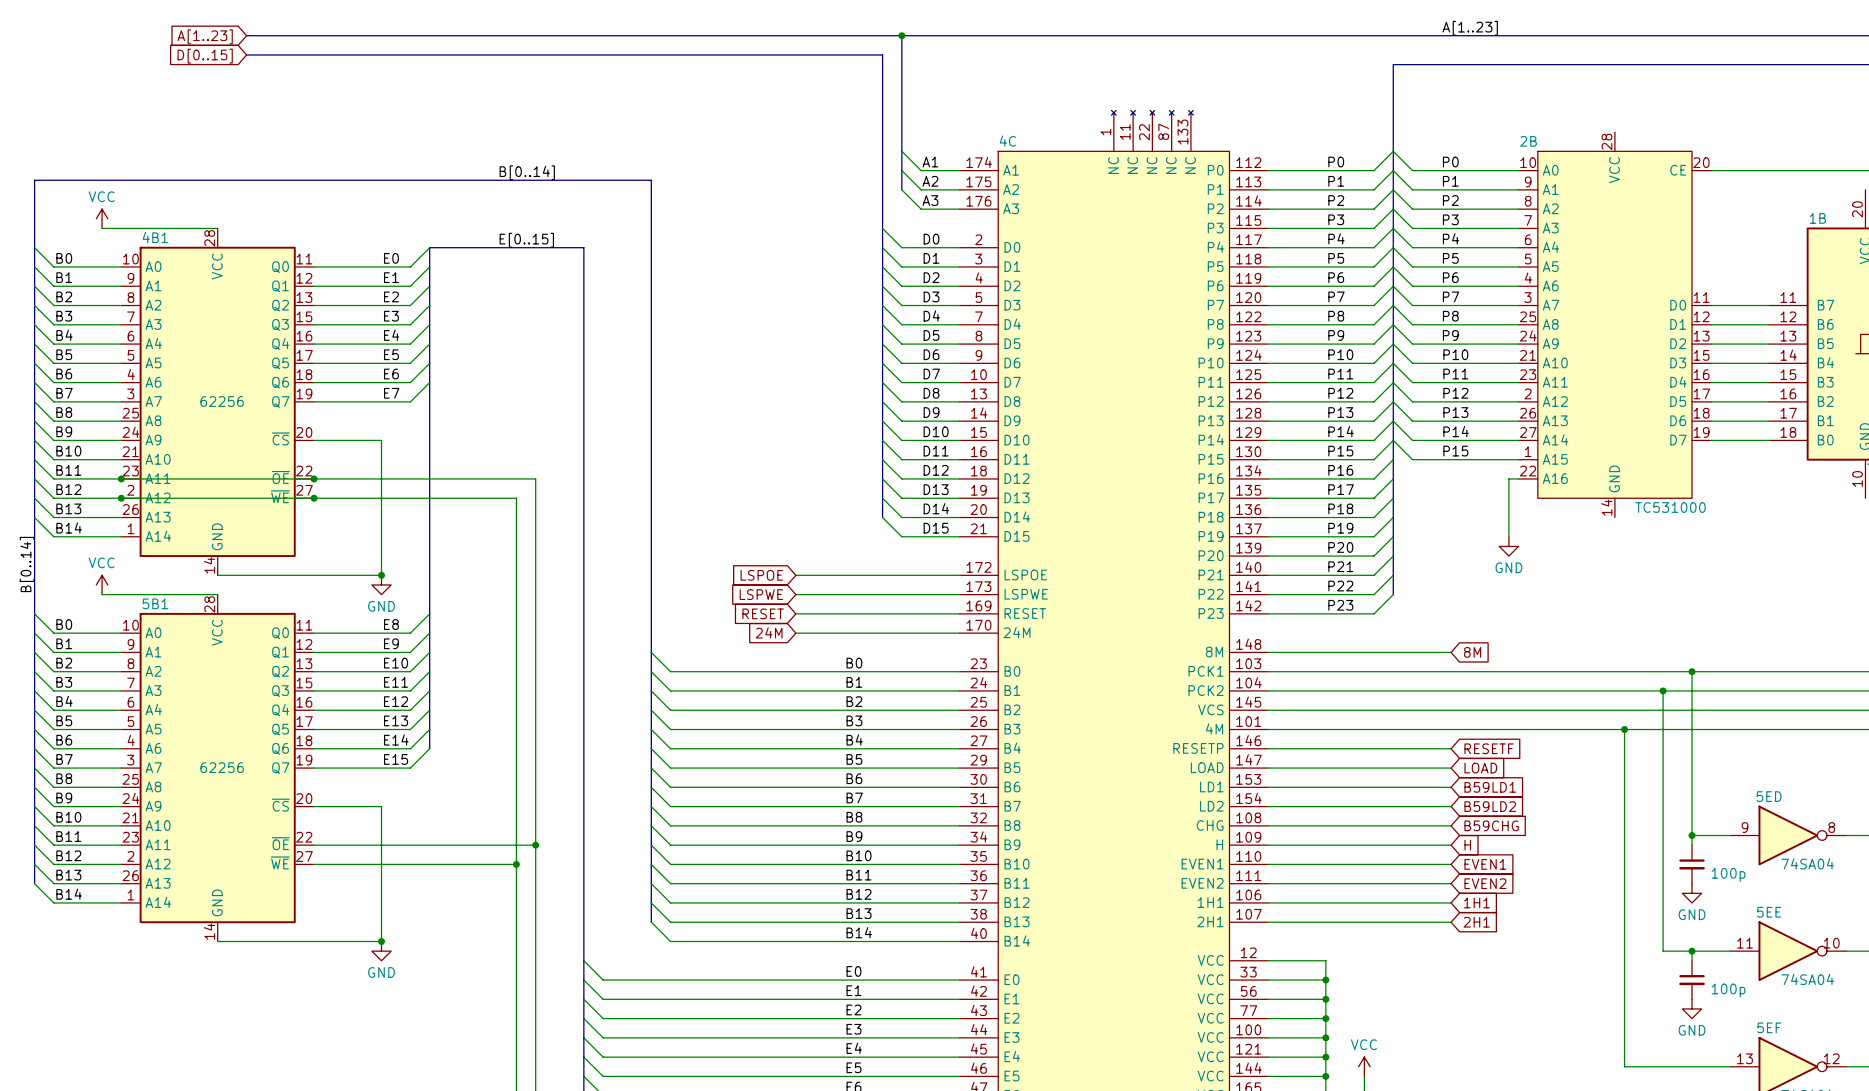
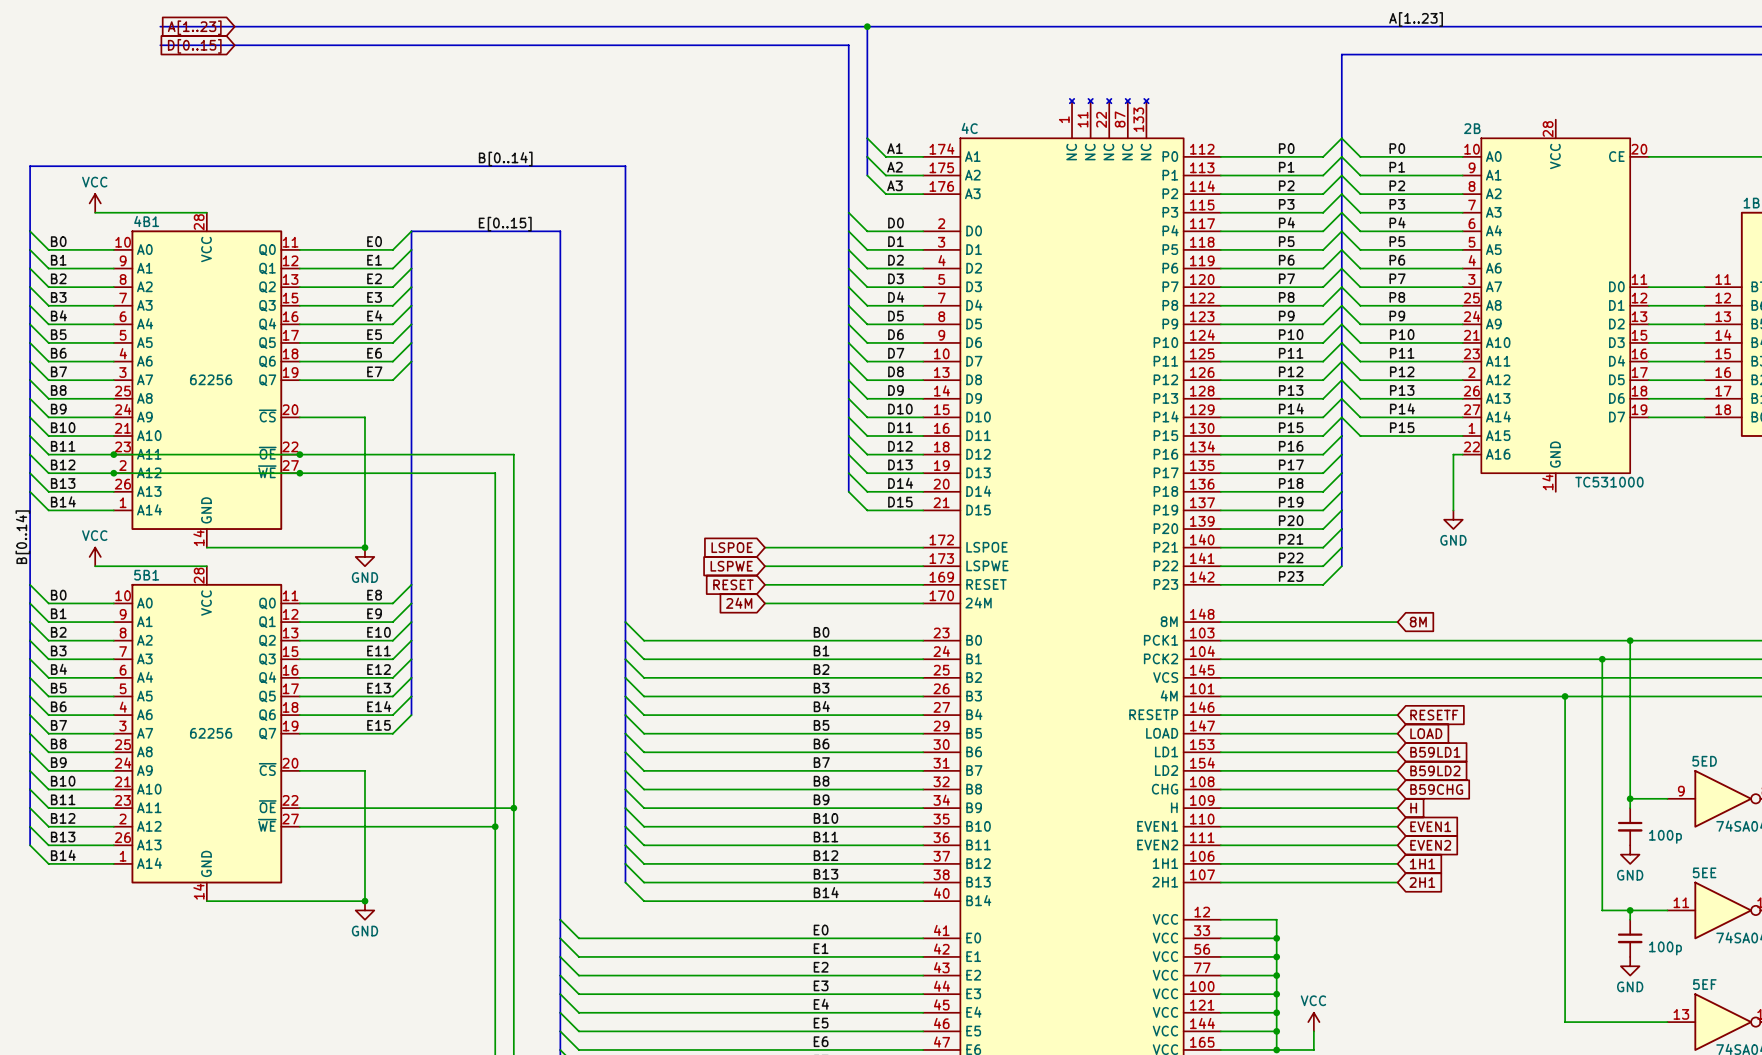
bus: none -> (160, 26) (234, 26)
bus: none -> (160, 45) (234, 45)

